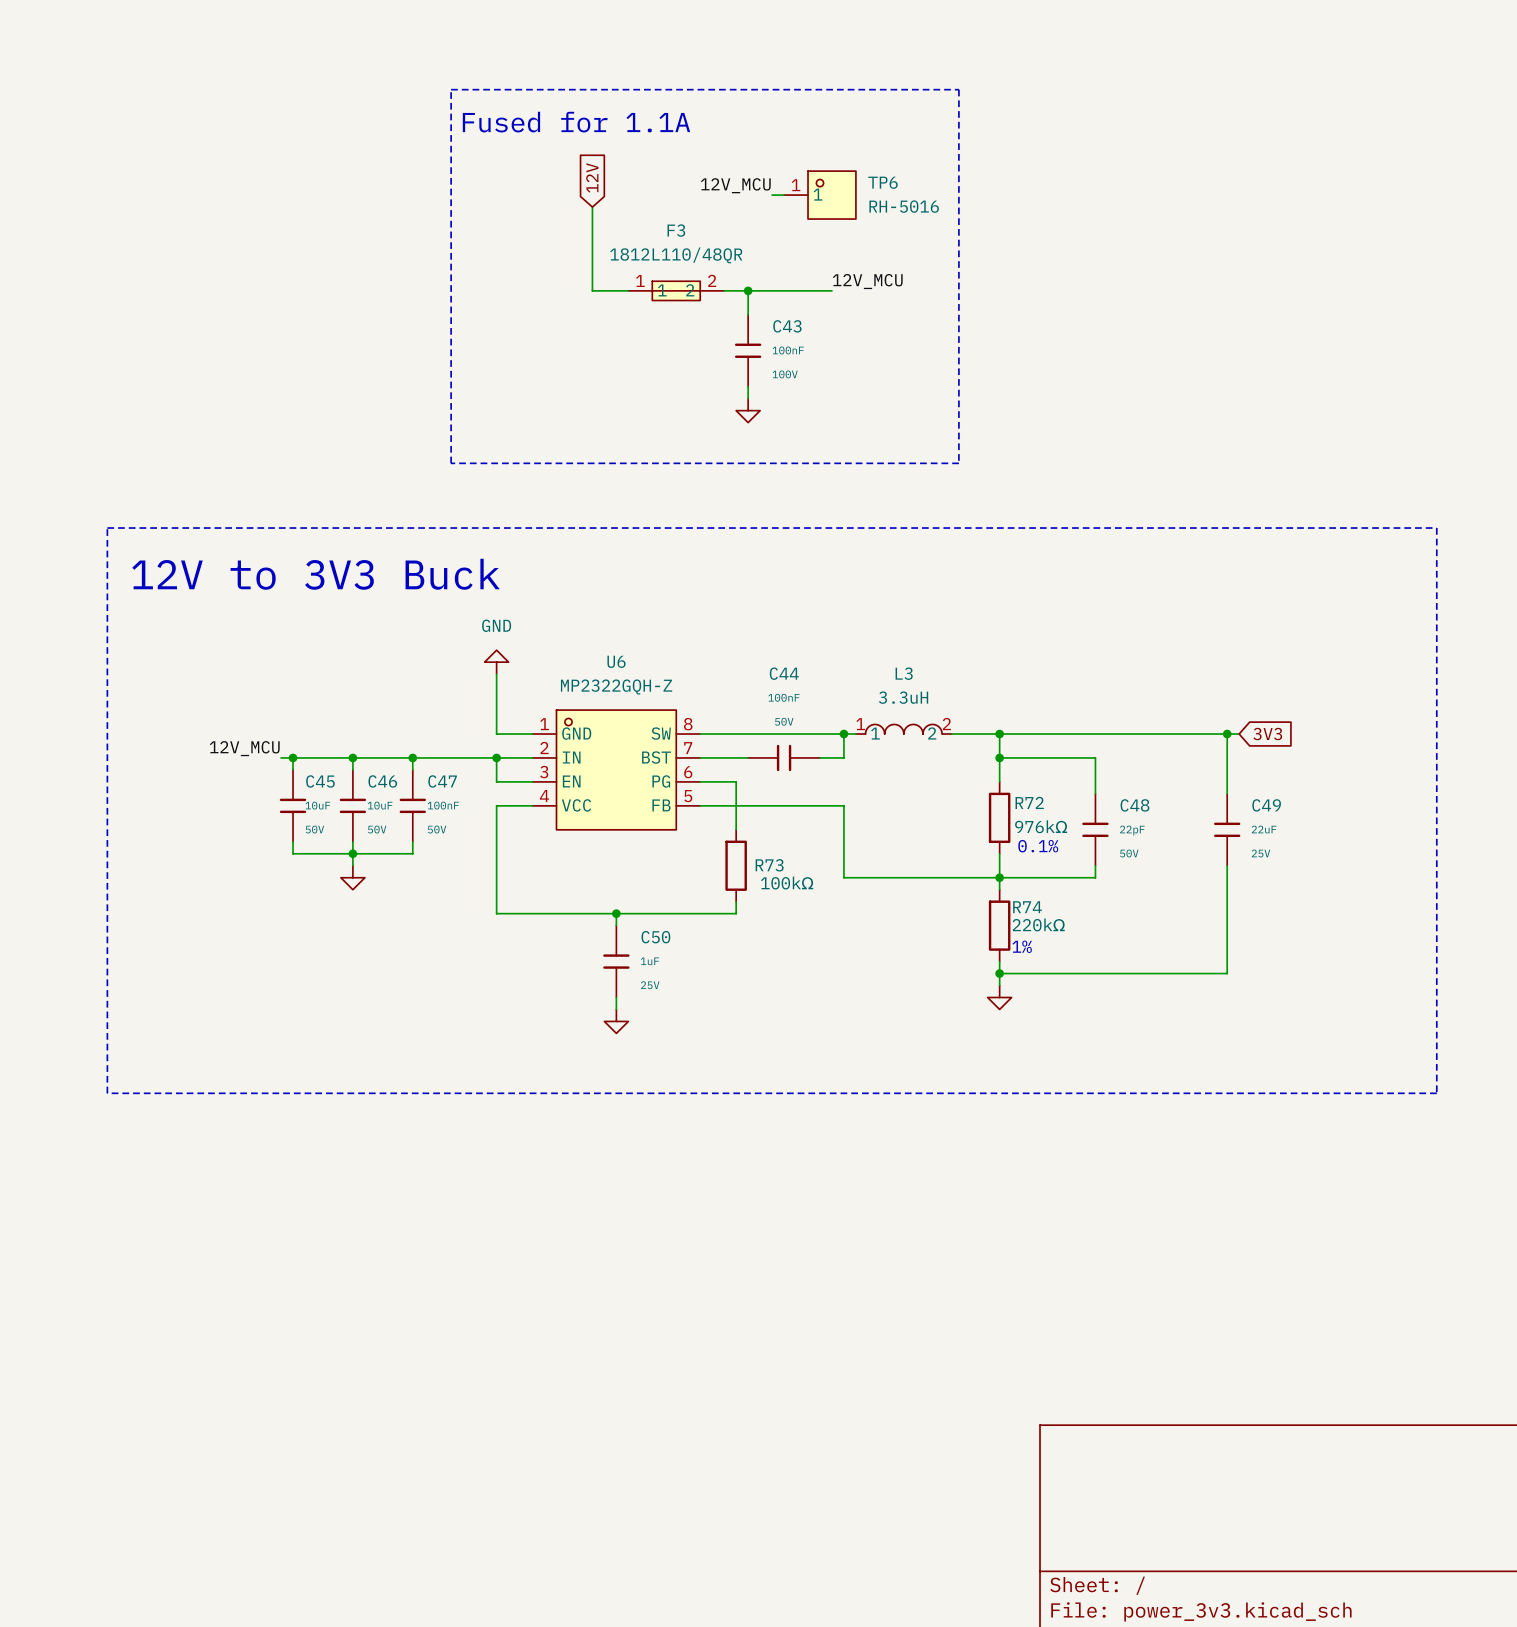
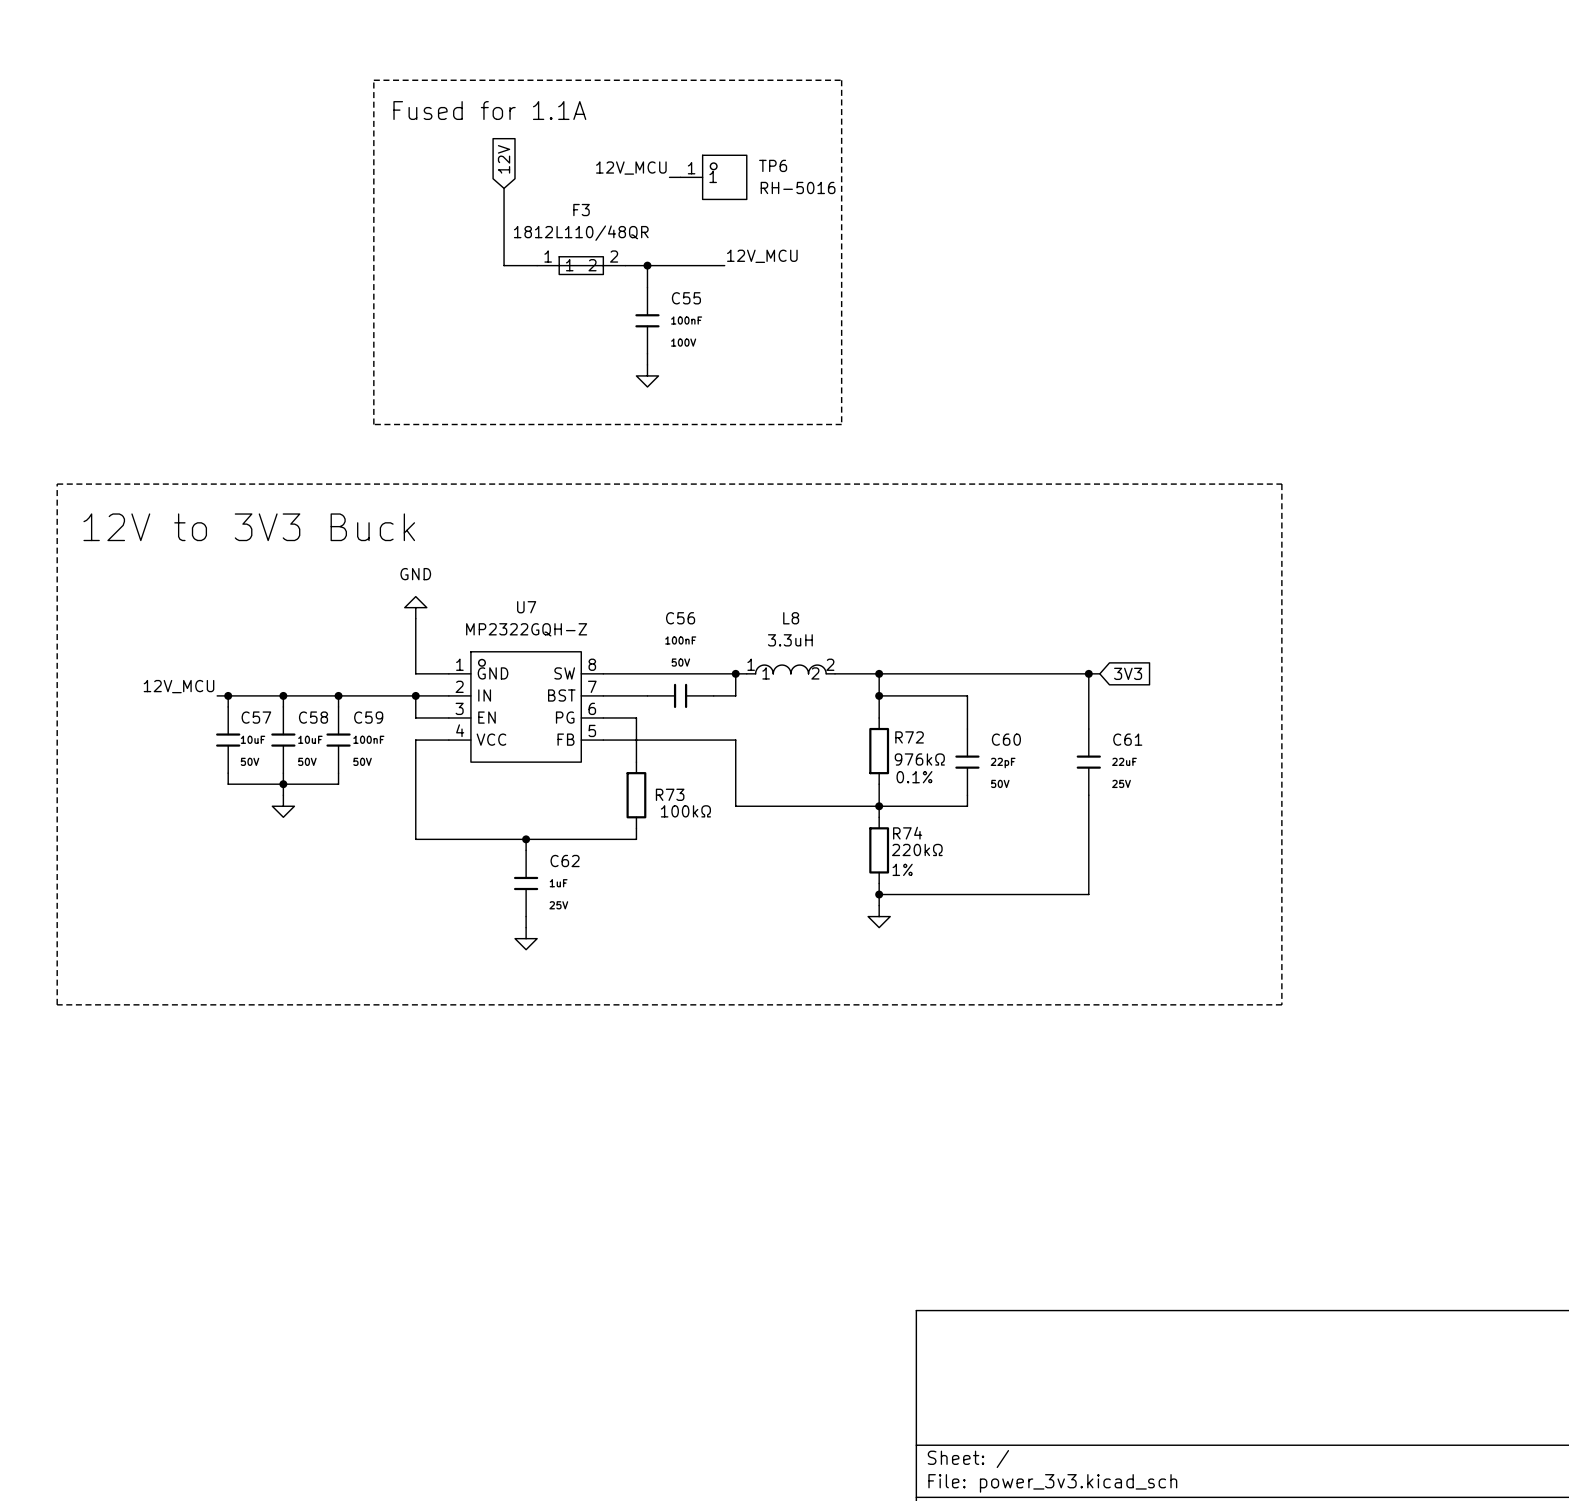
C43 name: C43 (787, 326) -> C55 (686, 298)
U6 name: U6 (616, 661) -> U7 (526, 607)
C44 name: C44 (784, 673) -> C56 (680, 618)
L3 name: L3 (904, 673) -> L8 (791, 618)
C45 name: C45 (320, 781) -> C57 (256, 717)
C46 name: C46 (382, 781) -> C58 (313, 717)
C47 name: C47 (442, 781) -> C59 (368, 717)
C48 name: C48 (1134, 805) -> C60 (1006, 739)
C49 name: C49 (1266, 805) -> C61 (1127, 739)
C50 name: C50 (655, 937) -> C62 (565, 861)

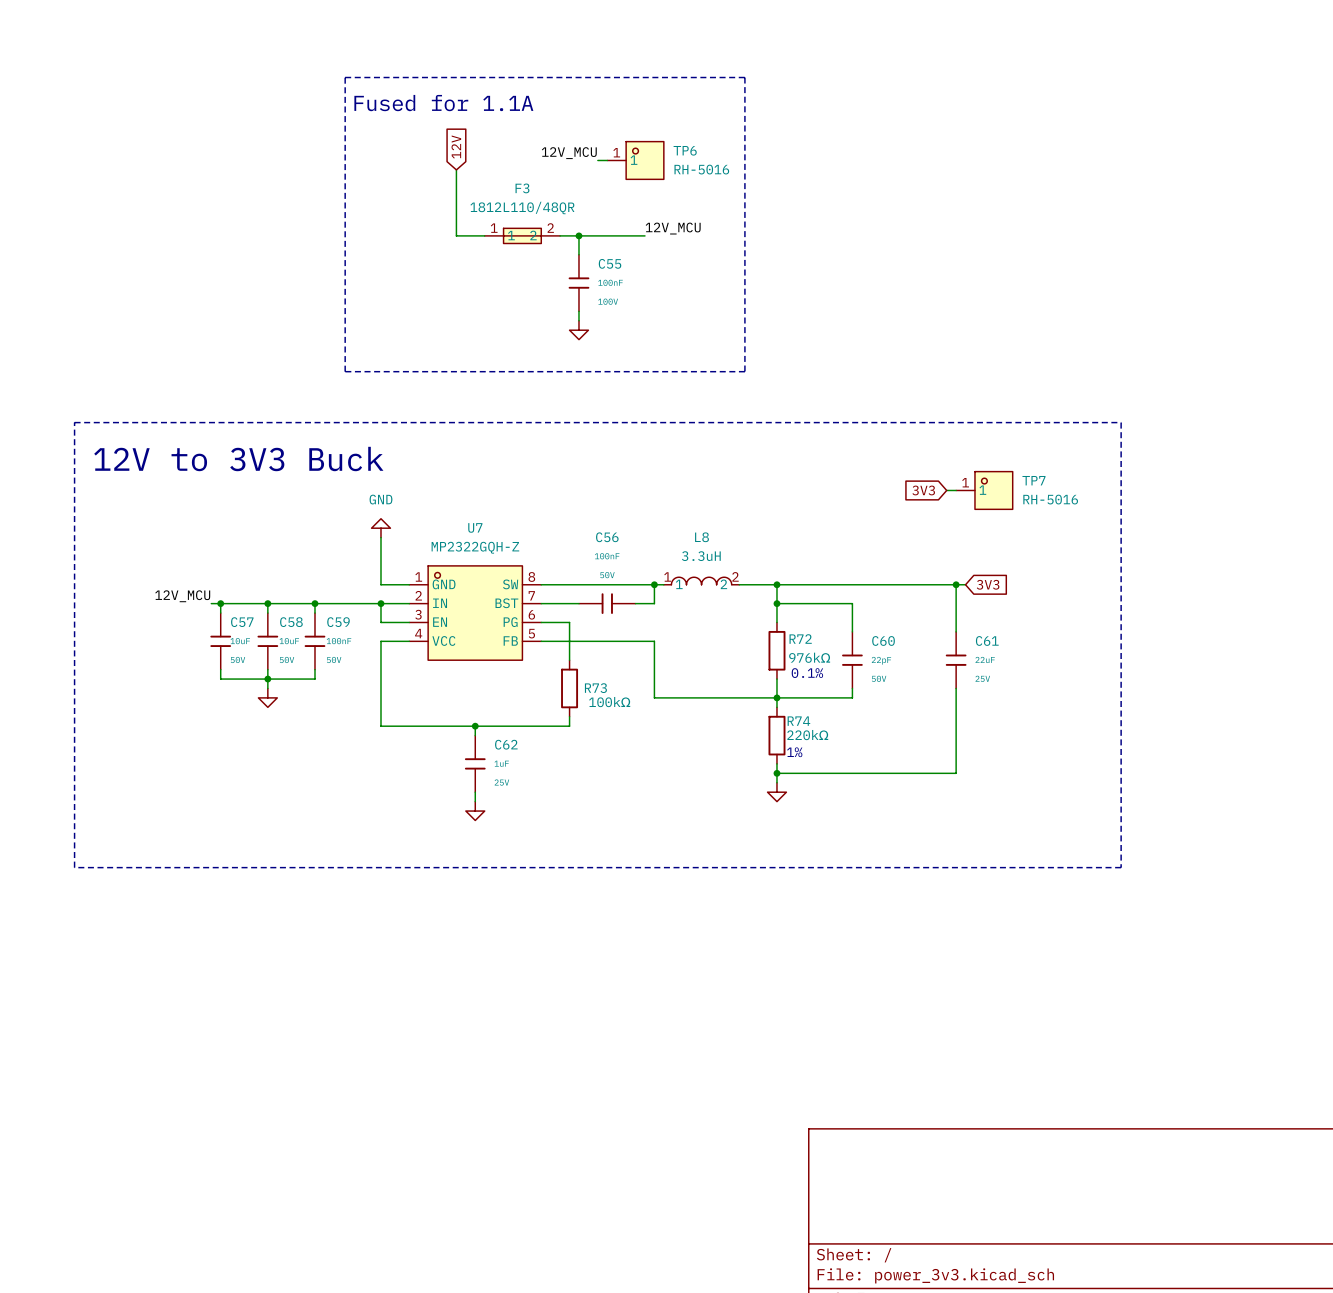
global label: none -> 3V3 (923, 490)
wire: none -> (946, 490) (956, 490)
TP7: none -> RH-5016 (984, 490)

